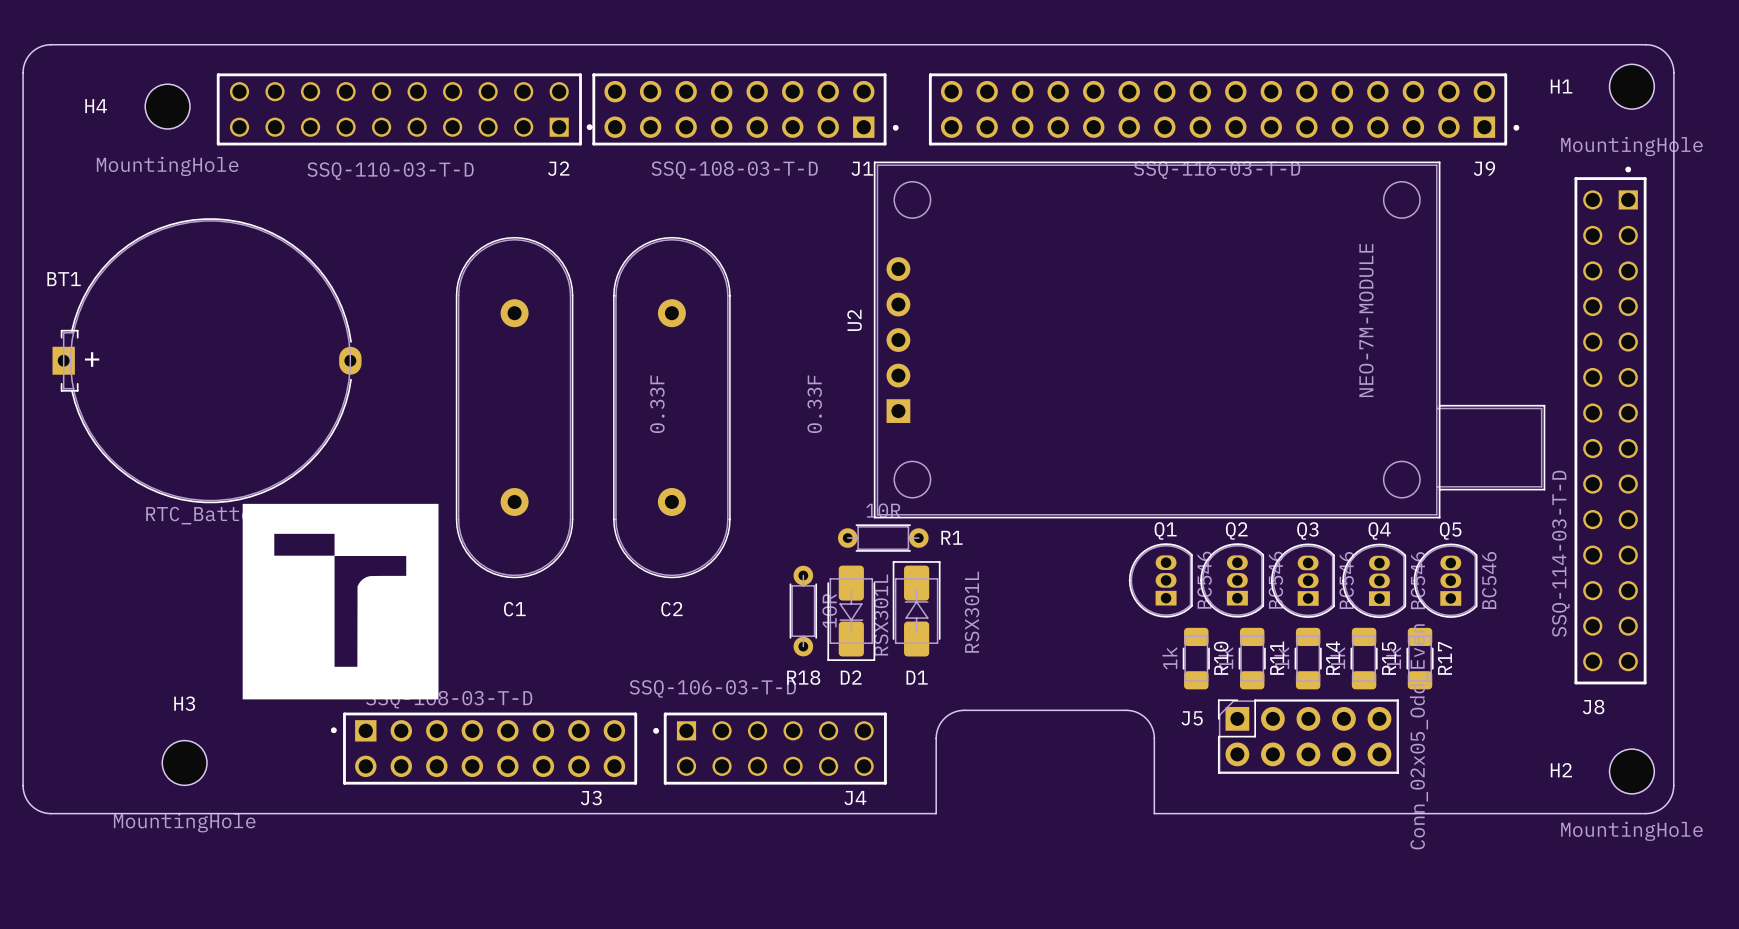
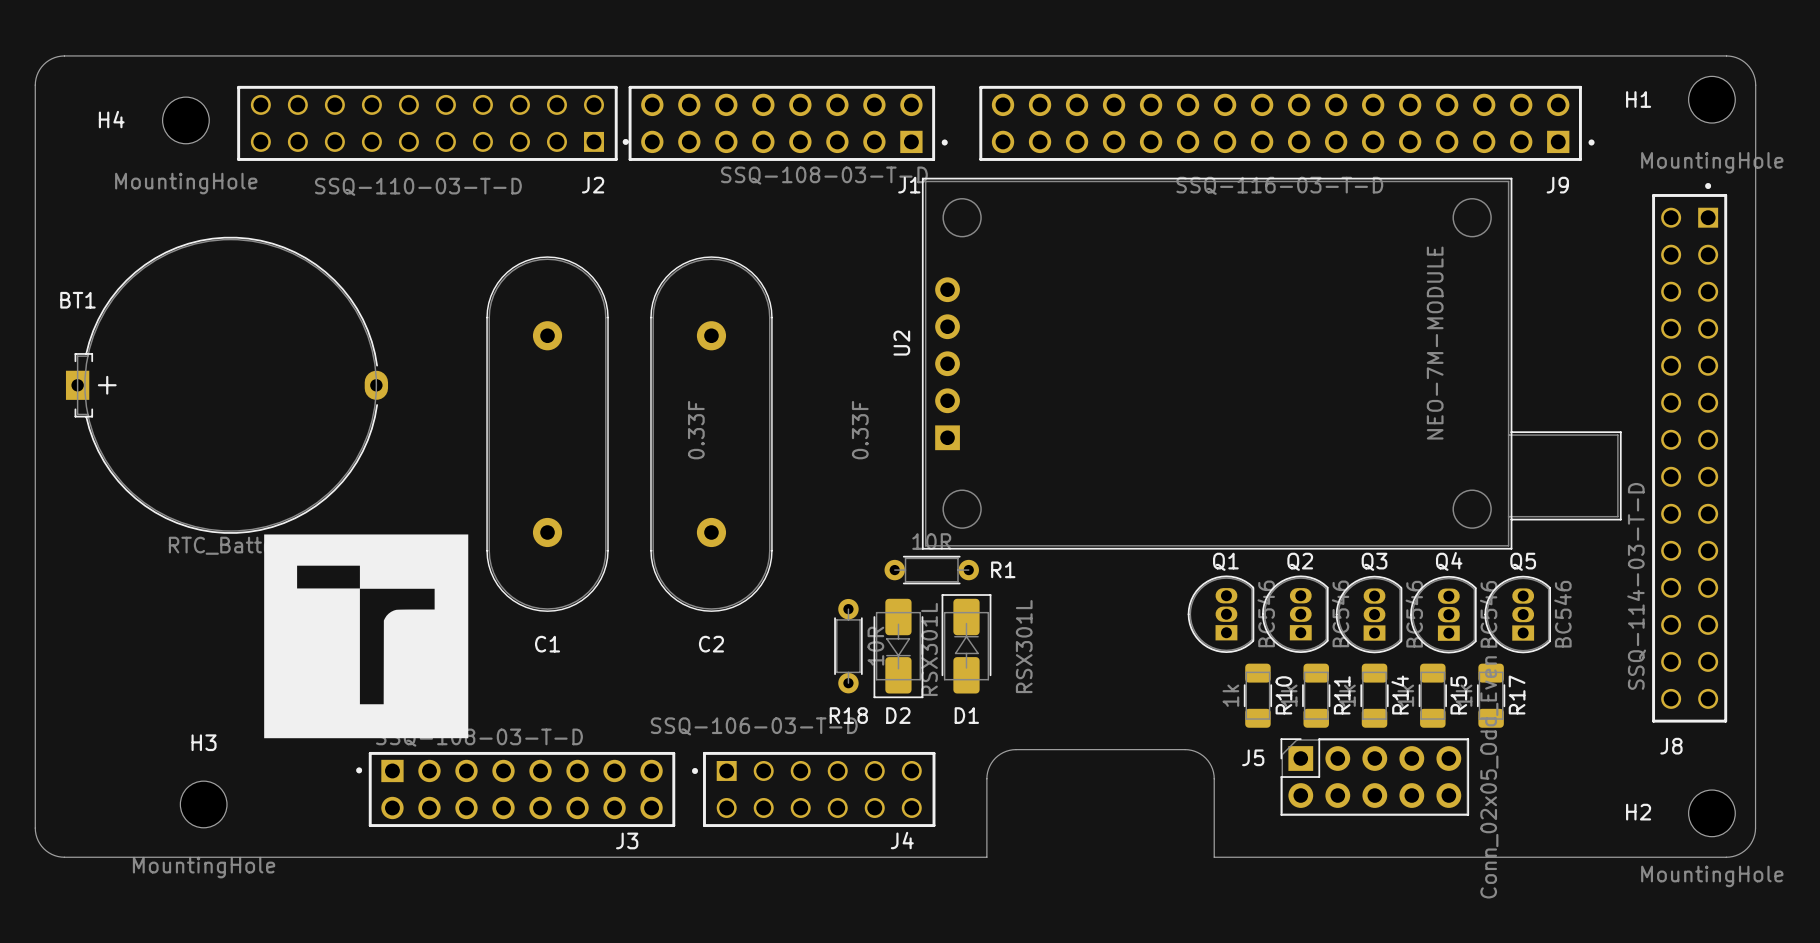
J1 value position: SSQ-108-03-T-D (734, 170) -> SSQ-108-03-T-D (824, 175)

